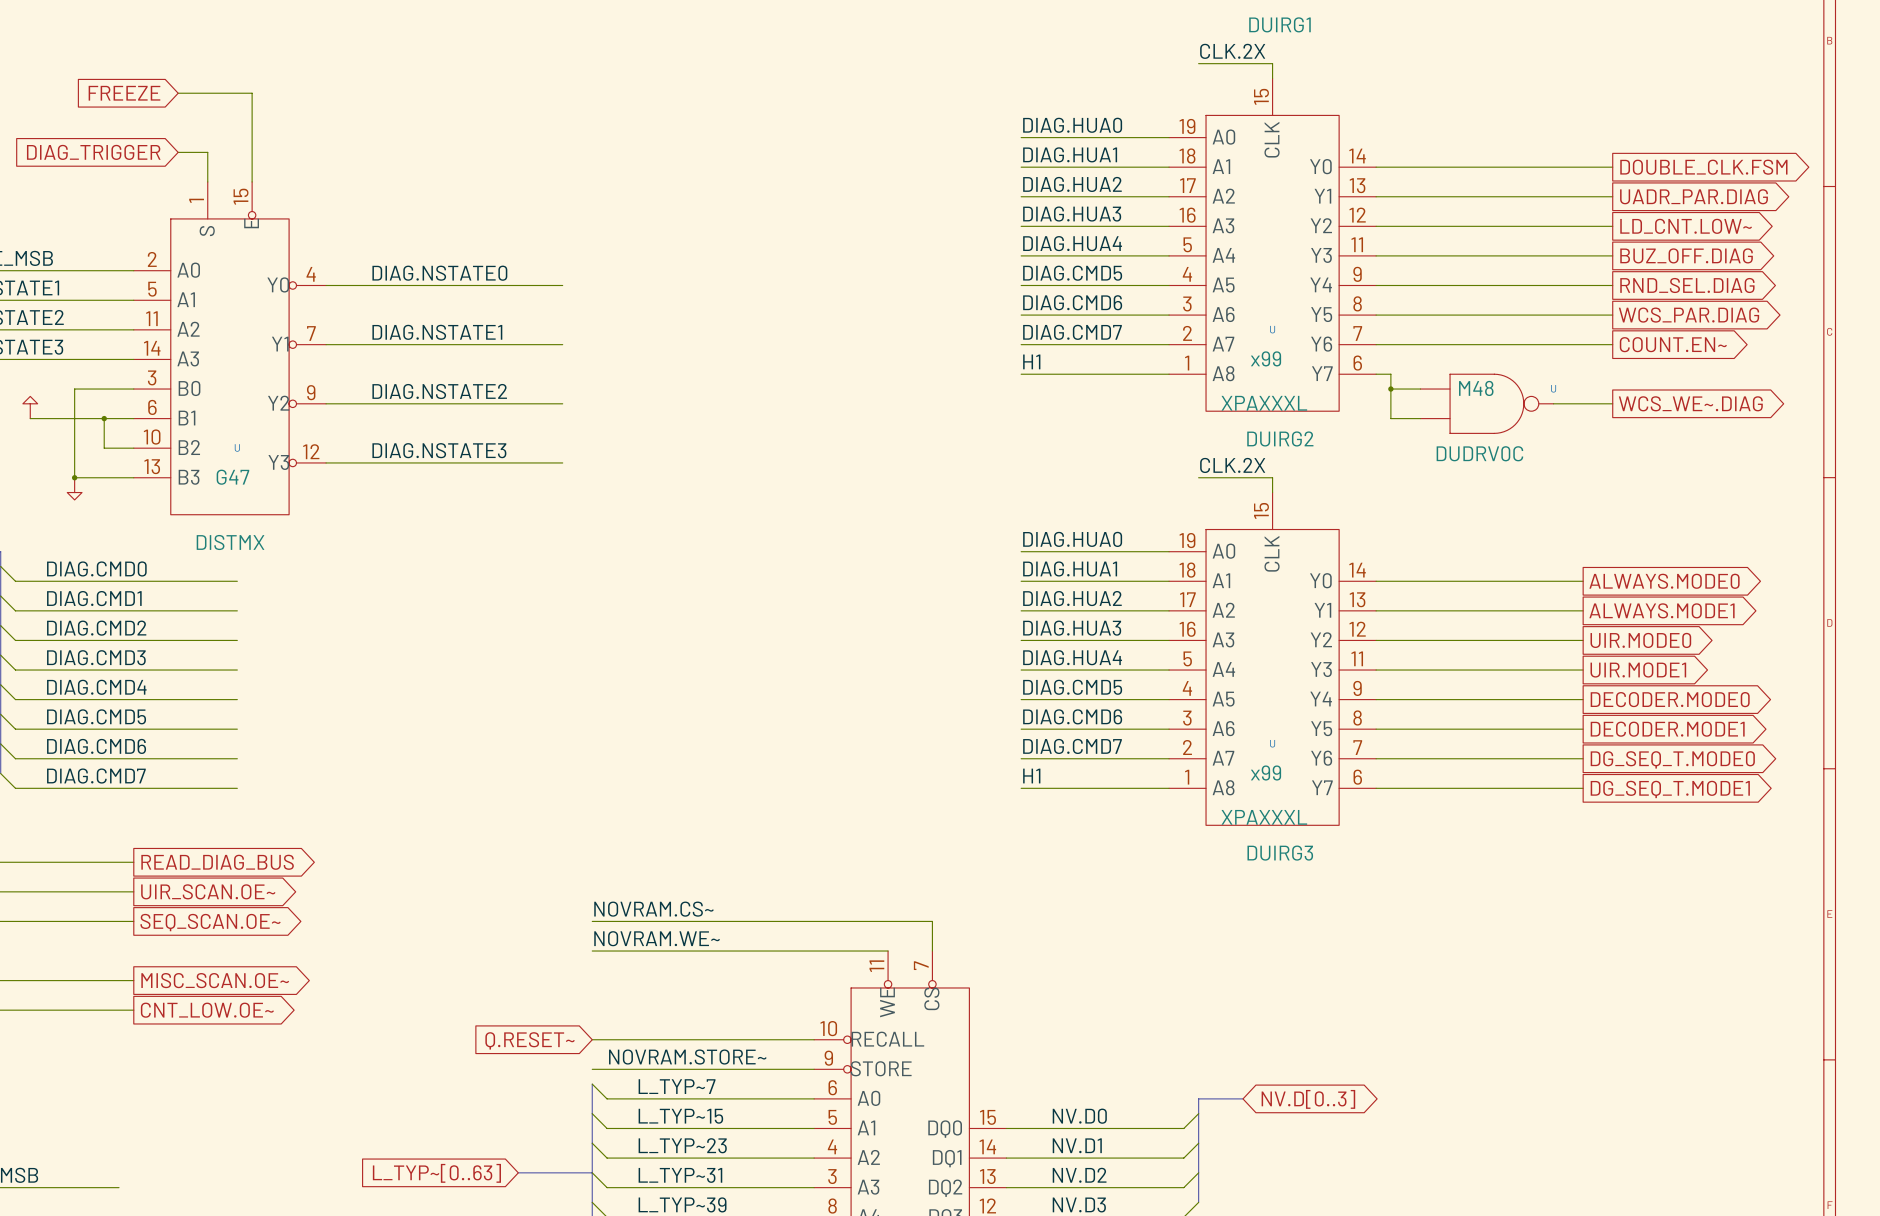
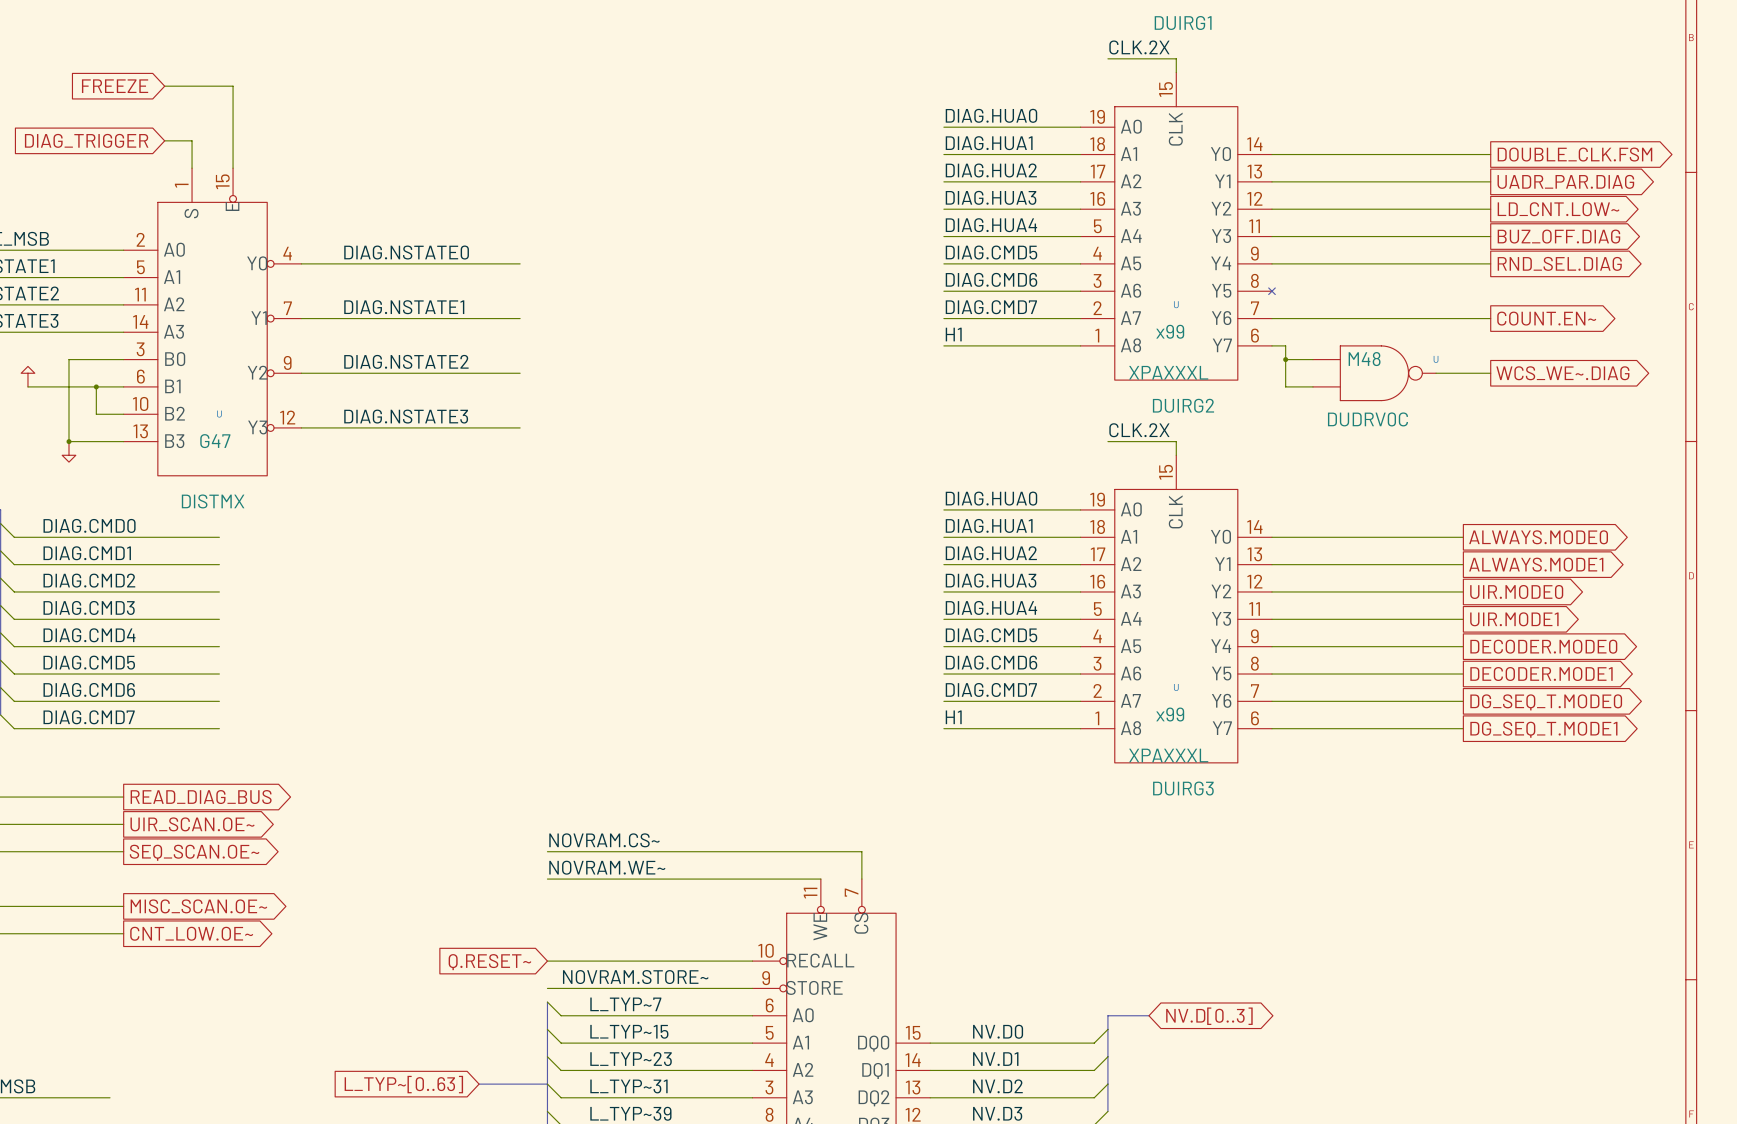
wire: (1376, 315) (1612, 315) -> none
no-connect mark: none -> (1271, 291)
global label: WCS_PAR.DIAG (1688, 315) -> none

